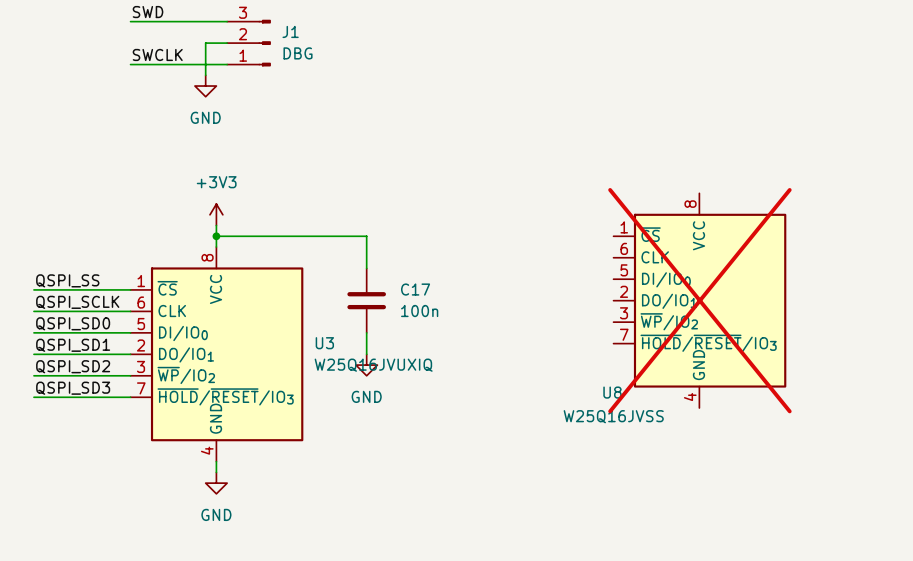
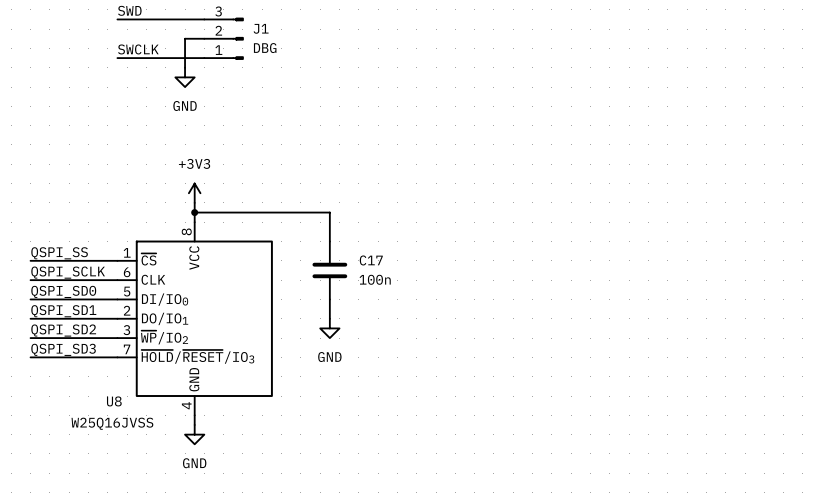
U8: W25Q16JVSS (699, 300) -> none
U3 name: U3 (324, 343) -> U8 (114, 401)
U3 value: W25Q16JVUXIQ (373, 365) -> W25Q16JVSS (112, 423)

